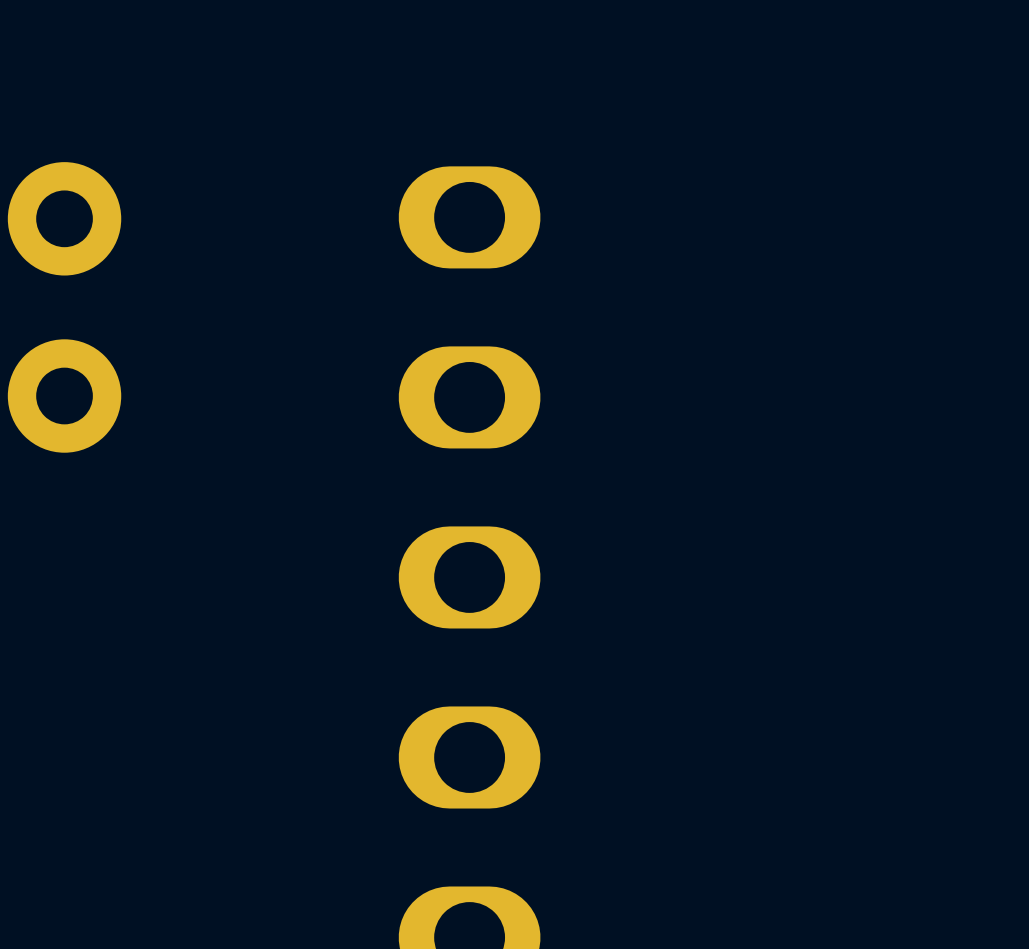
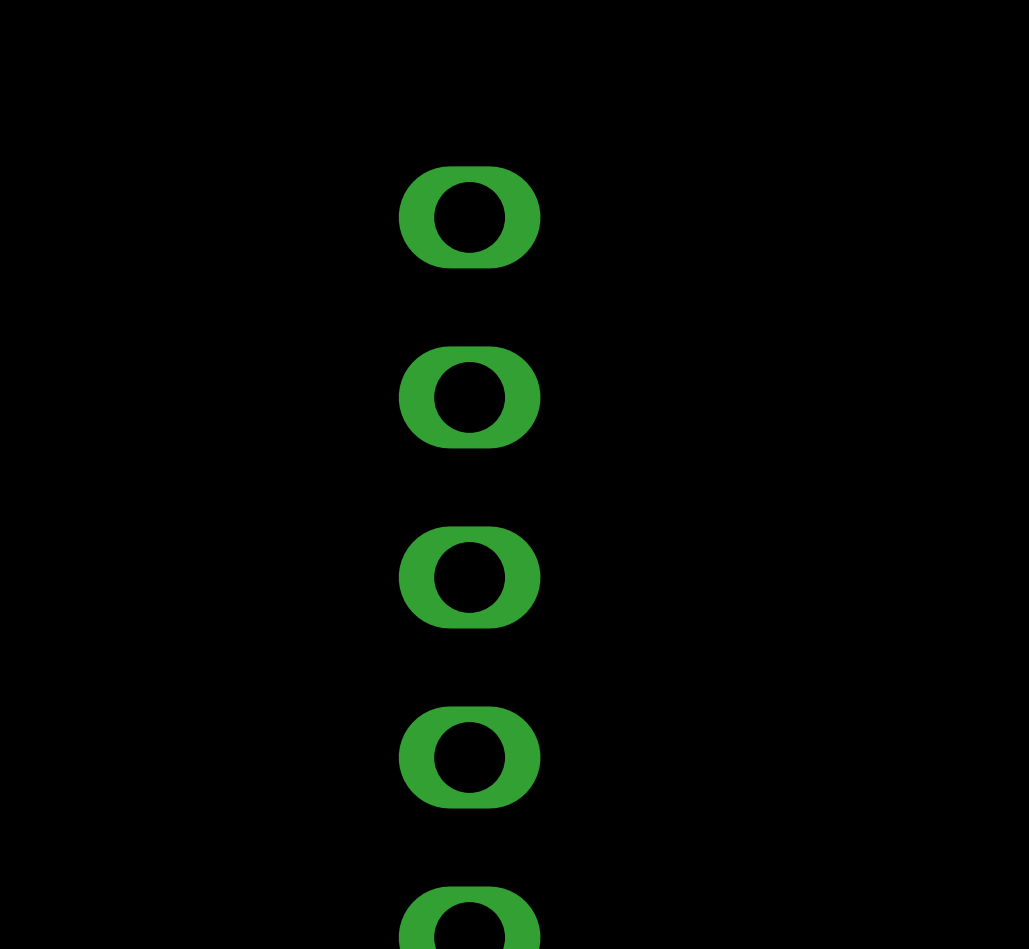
part: (64, 307) -> none

